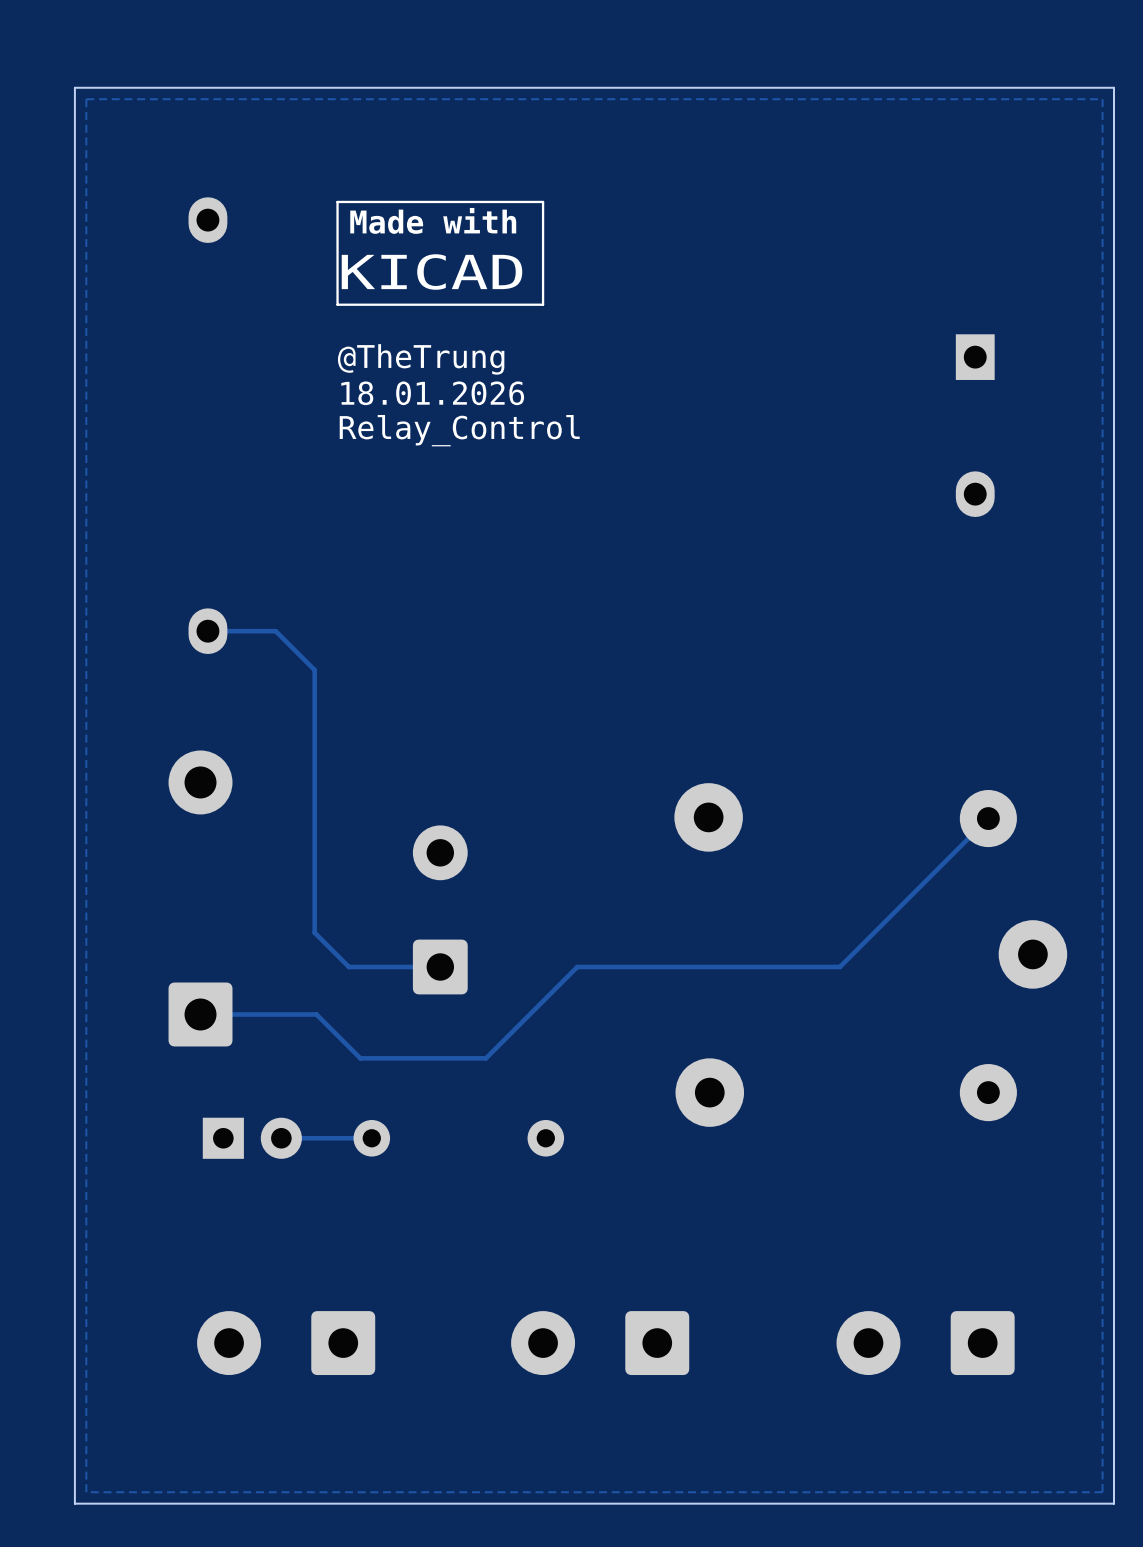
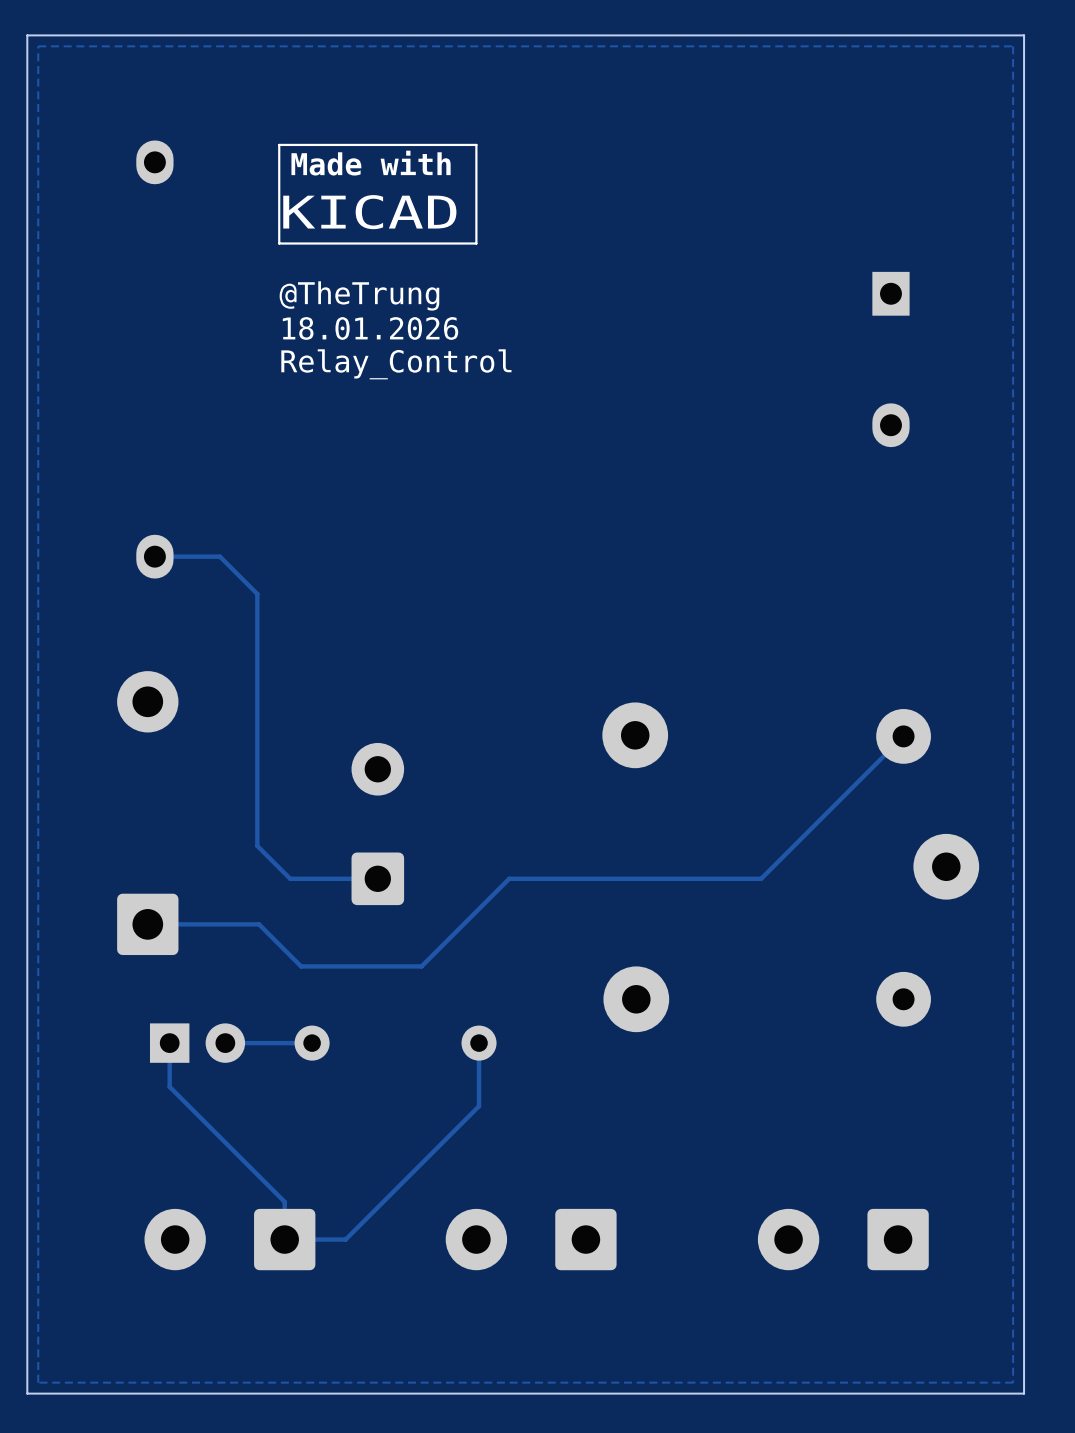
track: none -> (479, 1043) (479, 1106) (345, 1239) (284, 1239) (284, 1201) (169, 1086) (169, 1043)

